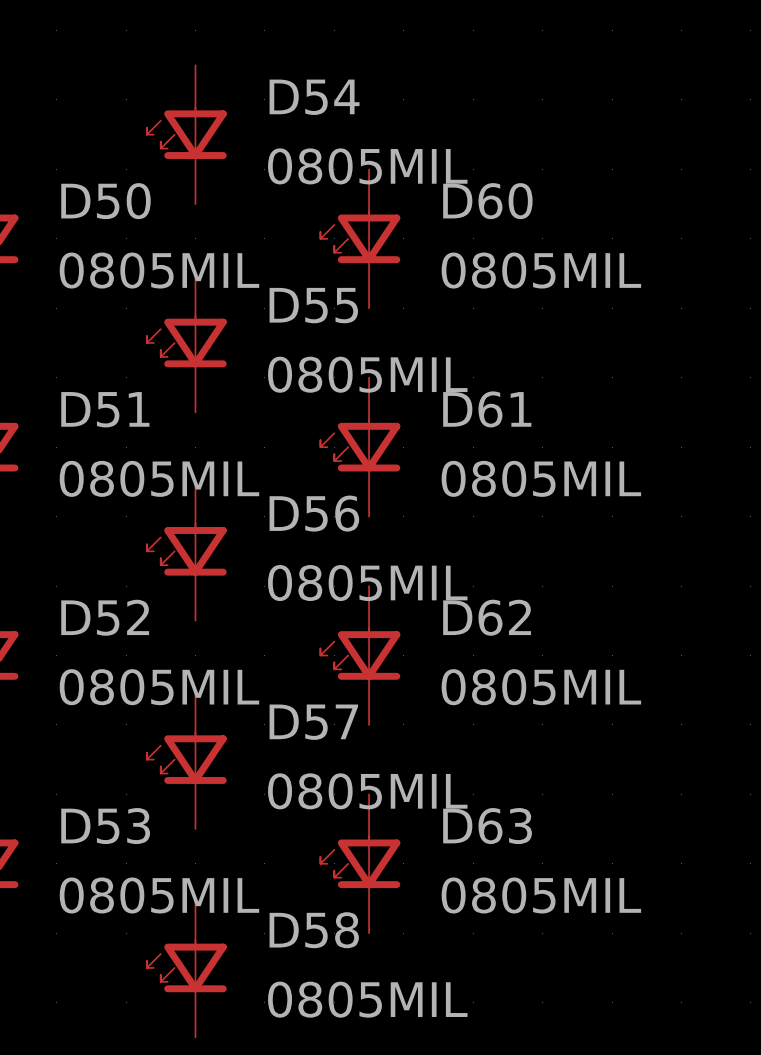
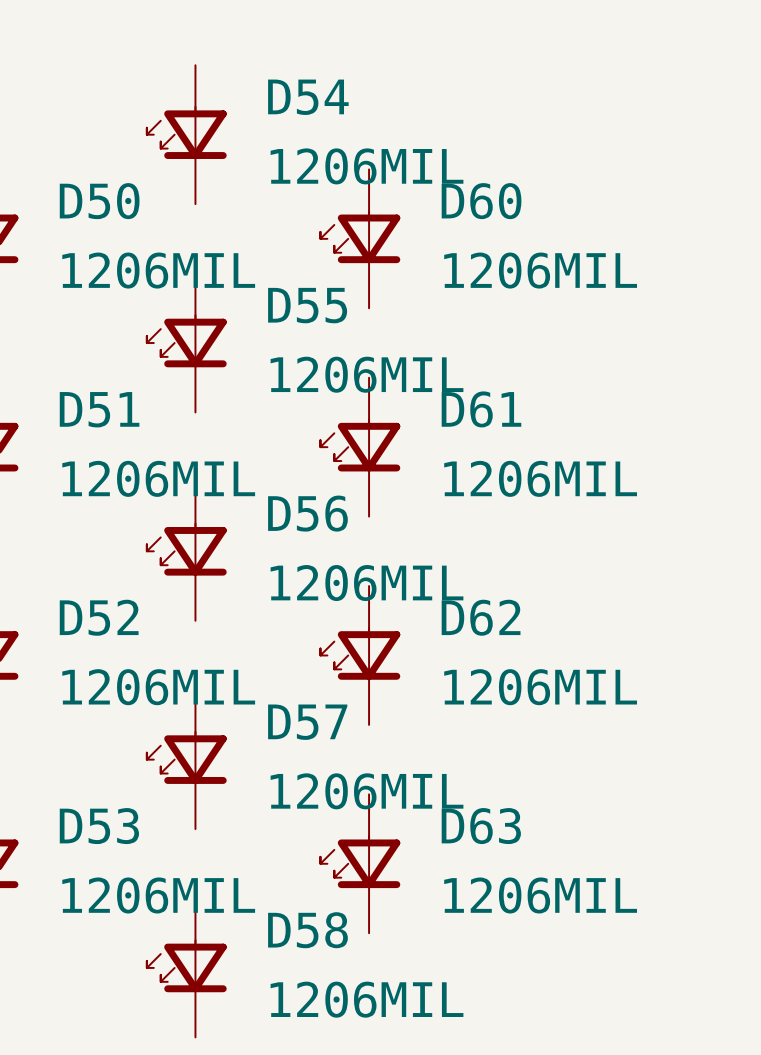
D54 value: 0805MIL (367, 166) -> 1206MIL (367, 166)
D50 value: 0805MIL (159, 270) -> 1206MIL (158, 270)
D60 value: 0805MIL (541, 270) -> 1206MIL (540, 270)
D55 value: 0805MIL (367, 374) -> 1206MIL (367, 374)
D51 value: 0805MIL (159, 478) -> 1206MIL (158, 478)
D61 value: 0805MIL (541, 478) -> 1206MIL (540, 478)
D56 value: 0805MIL (367, 583) -> 1206MIL (367, 583)
D52 value: 0805MIL (159, 687) -> 1206MIL (158, 687)
D62 value: 0805MIL (541, 687) -> 1206MIL (540, 687)
D57 value: 0805MIL (367, 791) -> 1206MIL (367, 791)
D53 value: 0805MIL (159, 895) -> 1206MIL (158, 895)
D63 value: 0805MIL (541, 895) -> 1206MIL (540, 895)
D58 value: 0805MIL (367, 999) -> 1206MIL (367, 999)

